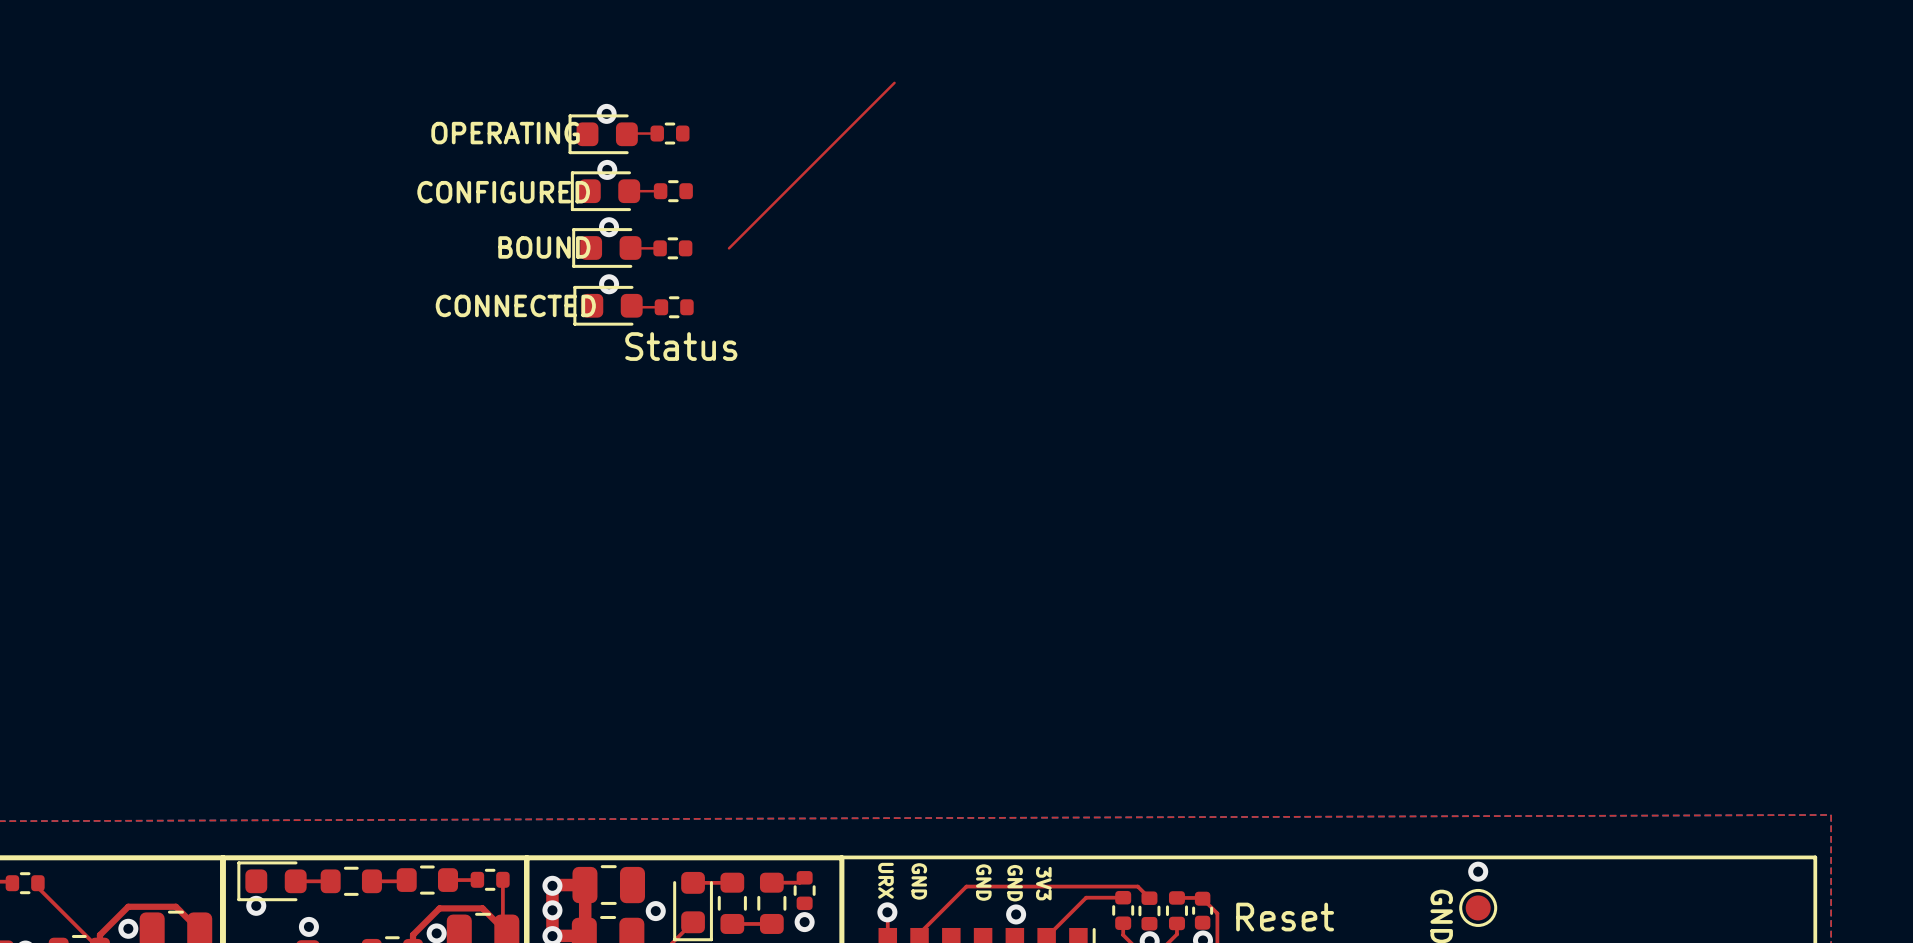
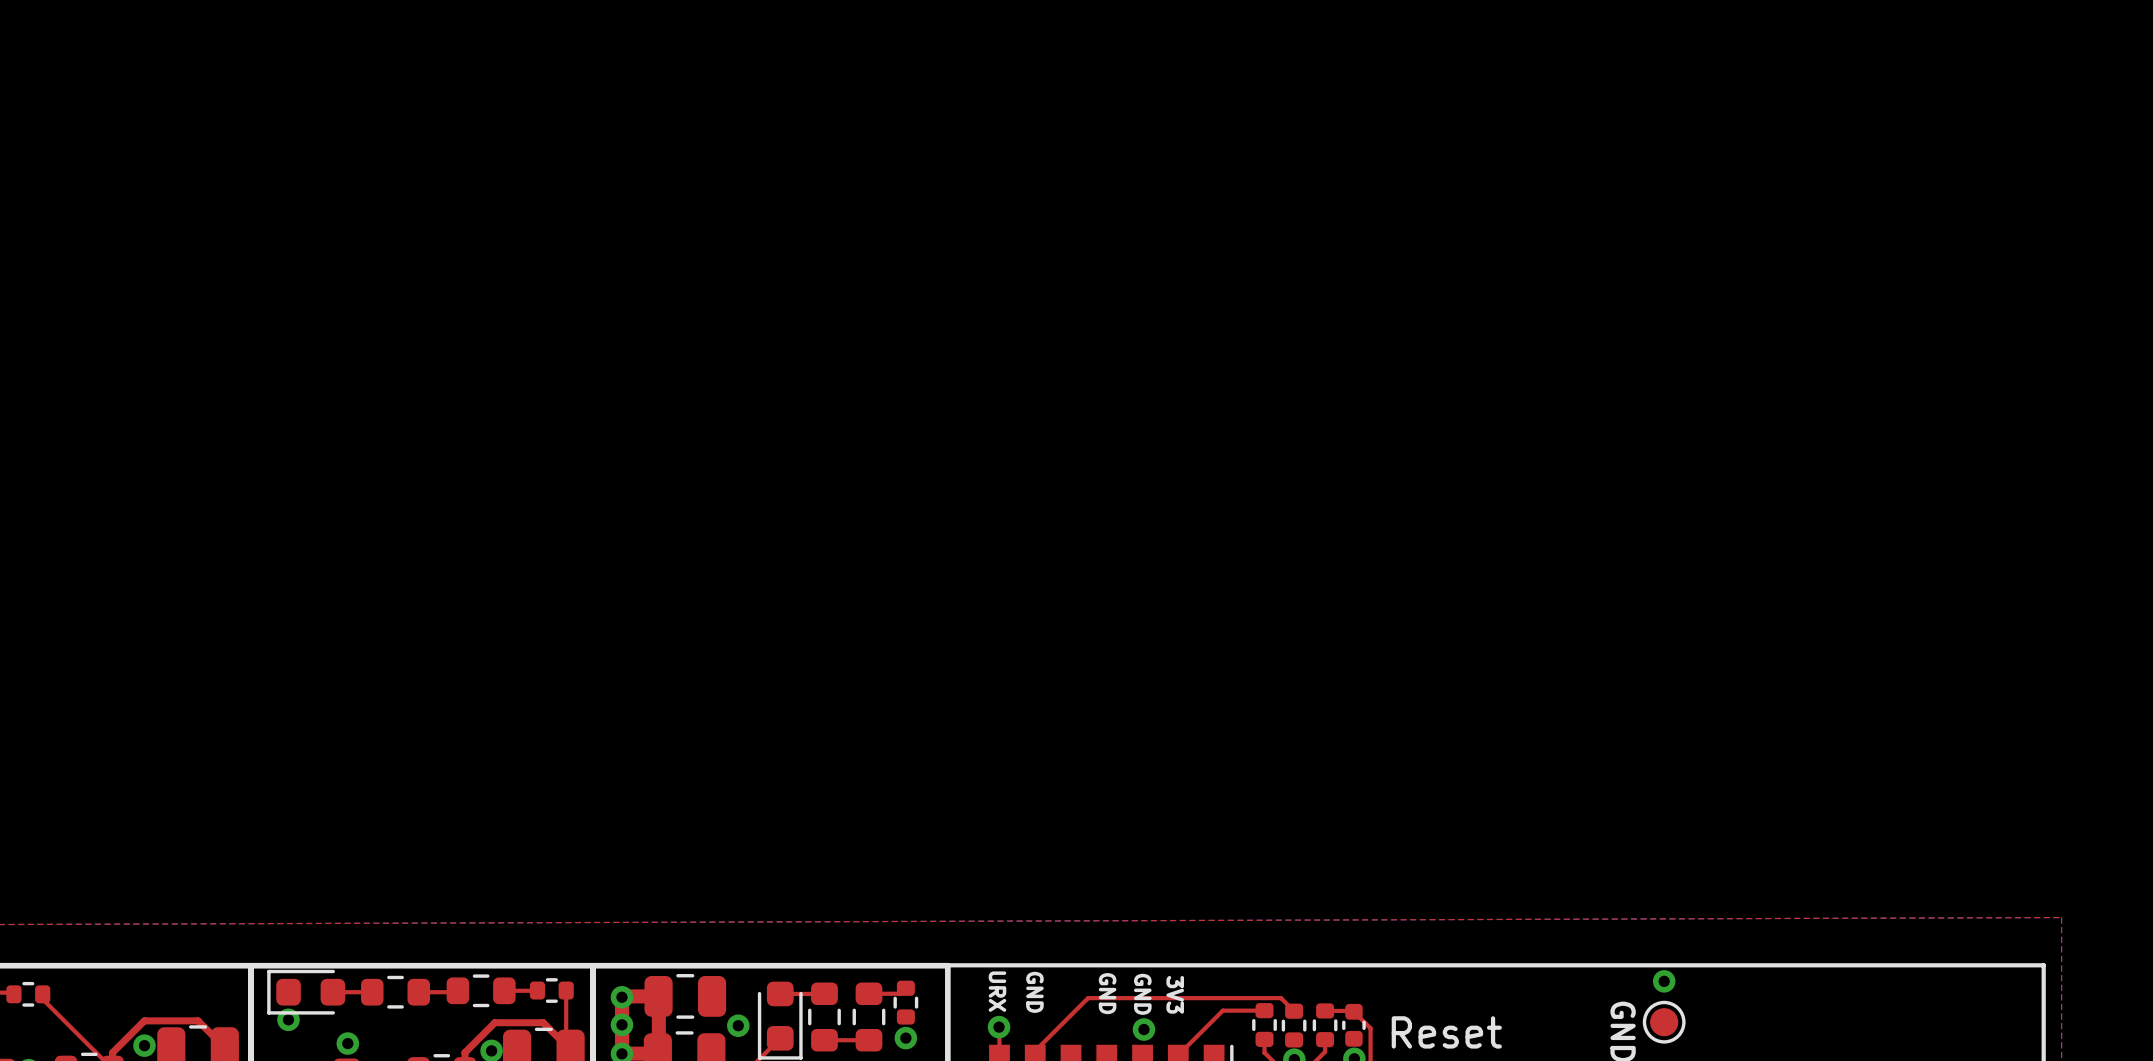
top track: (894, 82) (729, 248) -> none
via: (606, 113) -> none
text: OPERATING (505, 133) -> none
top track: (657, 133) (626, 134) -> none
part: (669, 133) -> none
part: (603, 134) -> none
via: (607, 169) -> none
part: (605, 191) -> none
top track: (629, 191) (660, 191) -> none
part: (673, 191) -> none
text: CONFIGURED (503, 192) -> none
via: (609, 227) -> none
text: BOUND (544, 247) -> none
part: (606, 247) -> none
top track: (630, 247) (660, 248) -> none
part: (672, 248) -> none
via: (609, 284) -> none
text: CONNECTED (515, 305) -> none
part: (608, 305) -> none
top track: (631, 305) (661, 307) -> none
part: (674, 307) -> none
text: Status (681, 346) -> none

